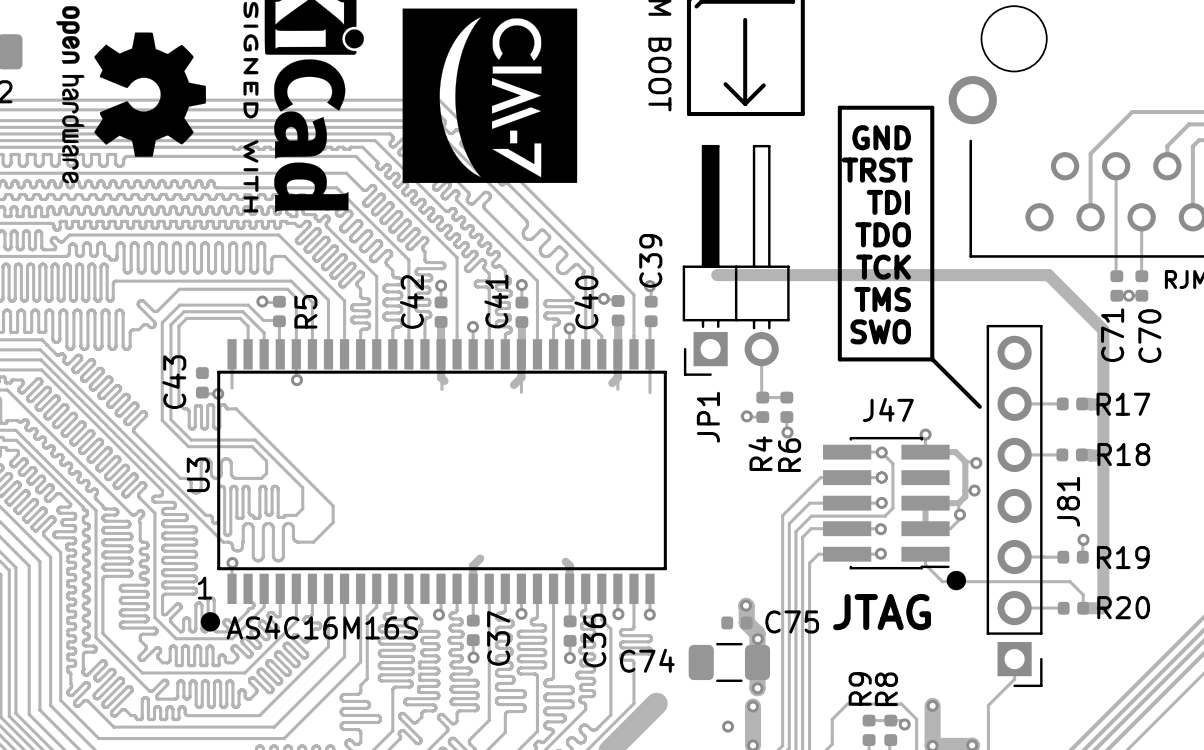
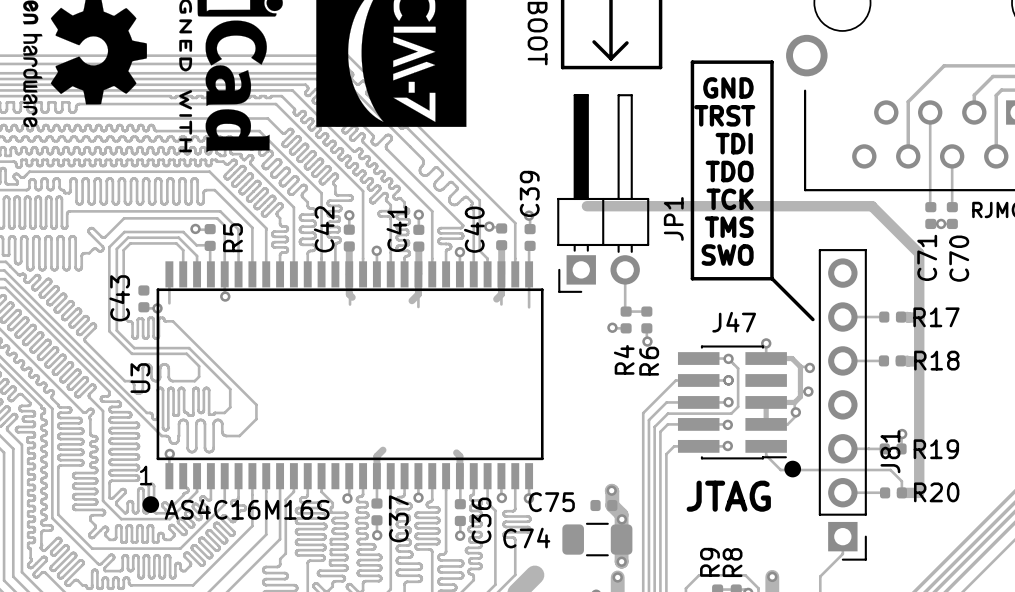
JP1 name position: JP1 (708, 417) -> JP1 (673, 218)
J81 name position: J81 (1068, 501) -> J81 (890, 451)
C75 name position: C75 (792, 621) -> C75 (551, 502)

